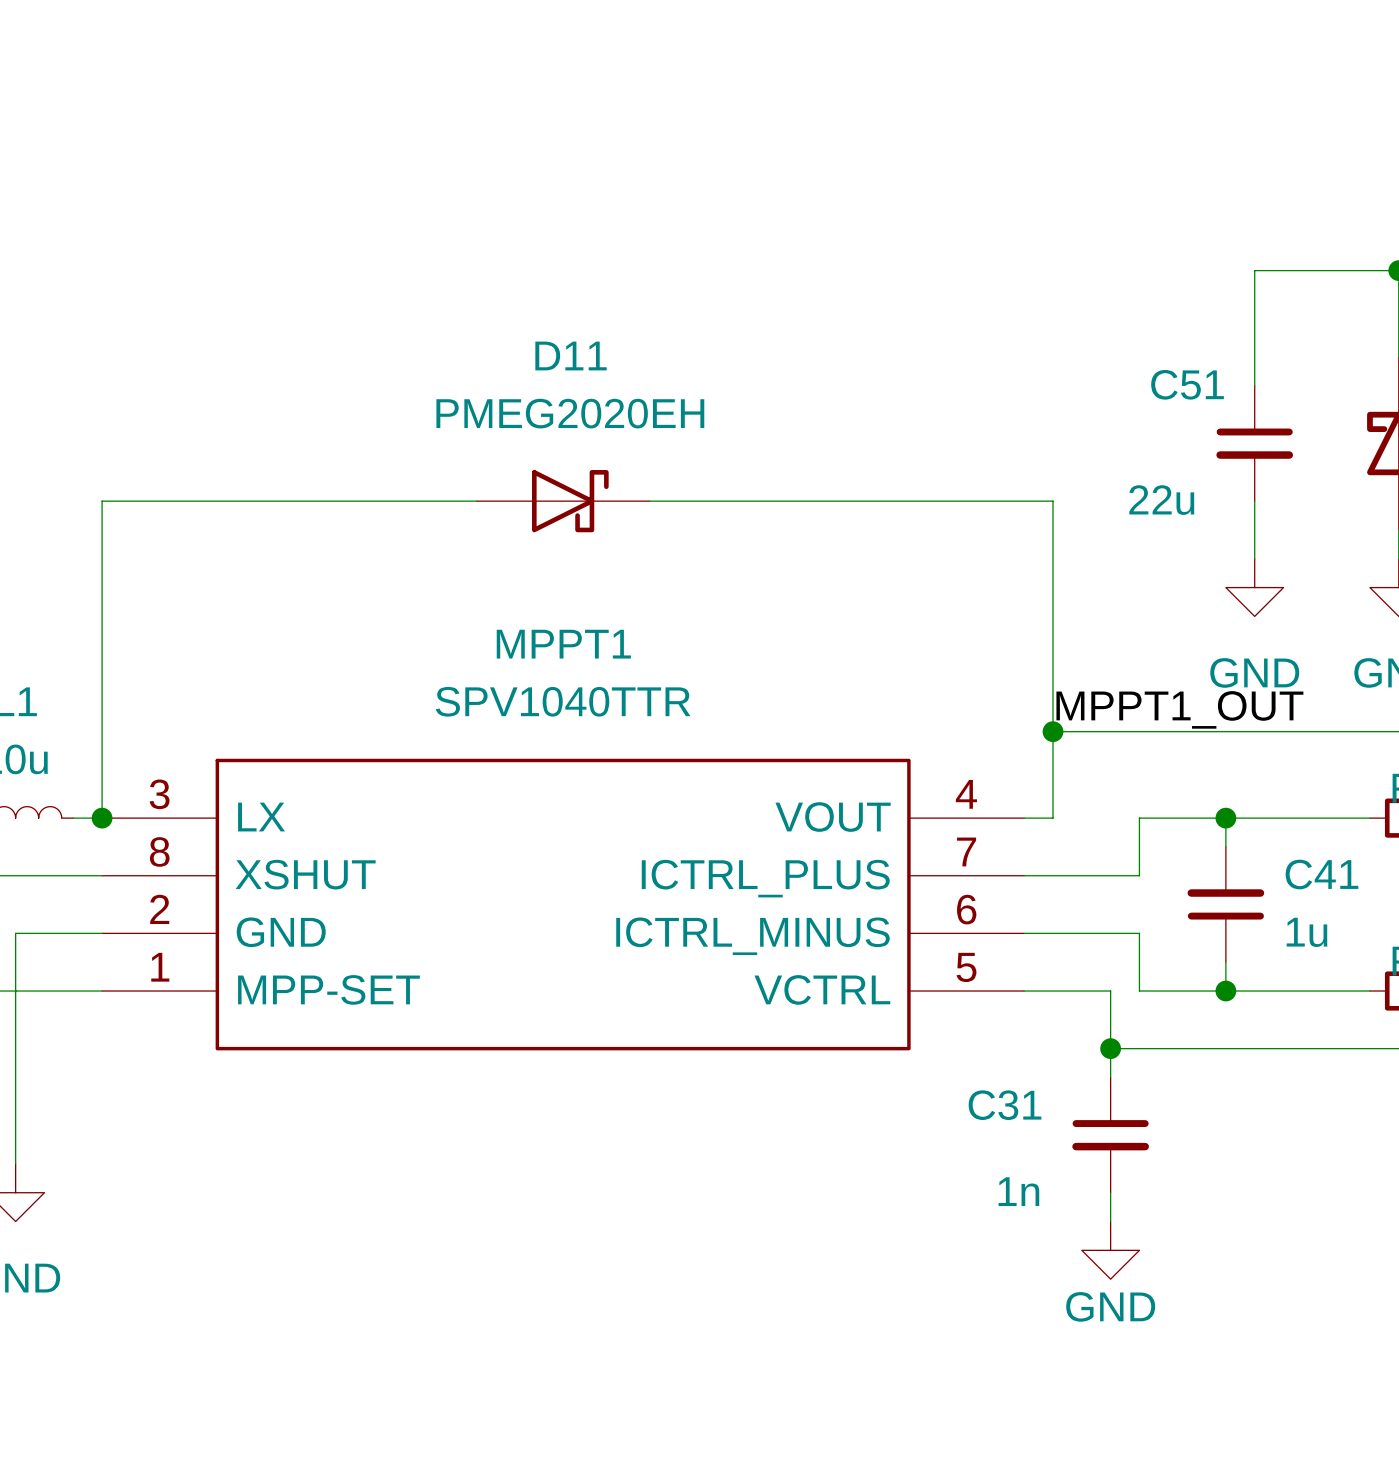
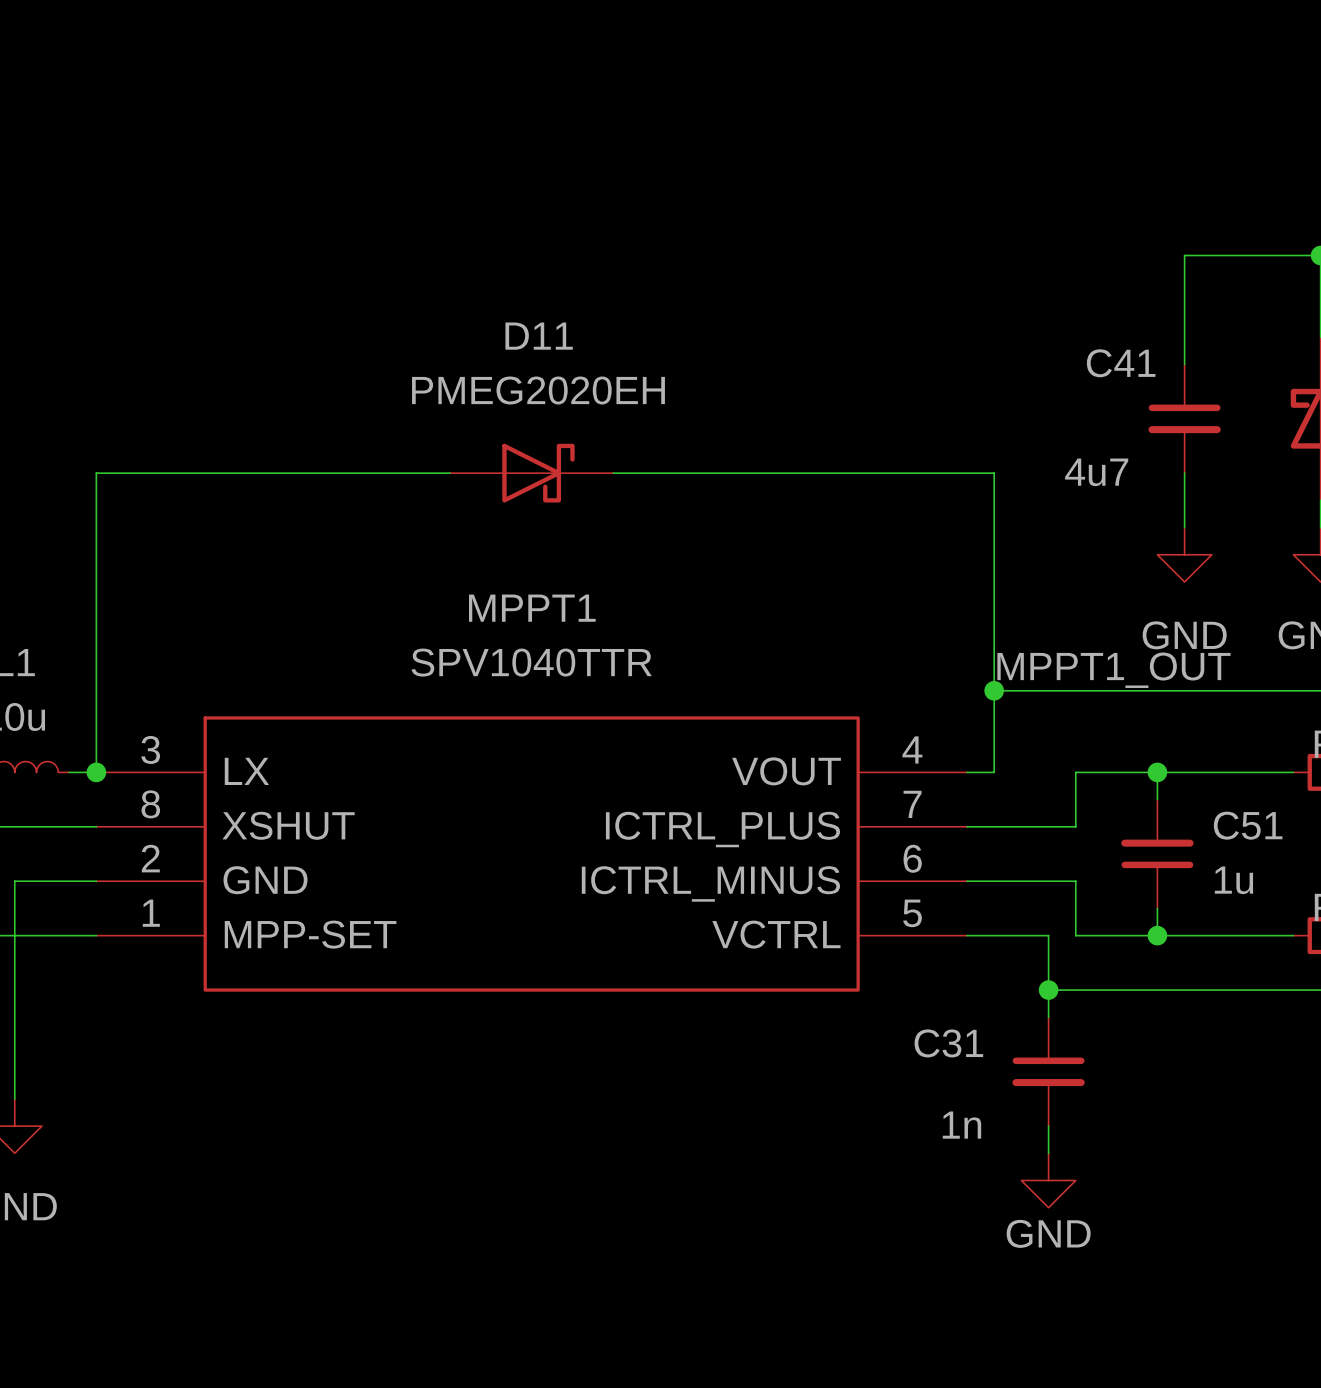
C51 name: C51 (1187, 384) -> C41 (1121, 363)
C51 value: 22u (1161, 500) -> 4u7 (1096, 472)
C41 name: C41 (1321, 874) -> C51 (1248, 825)

